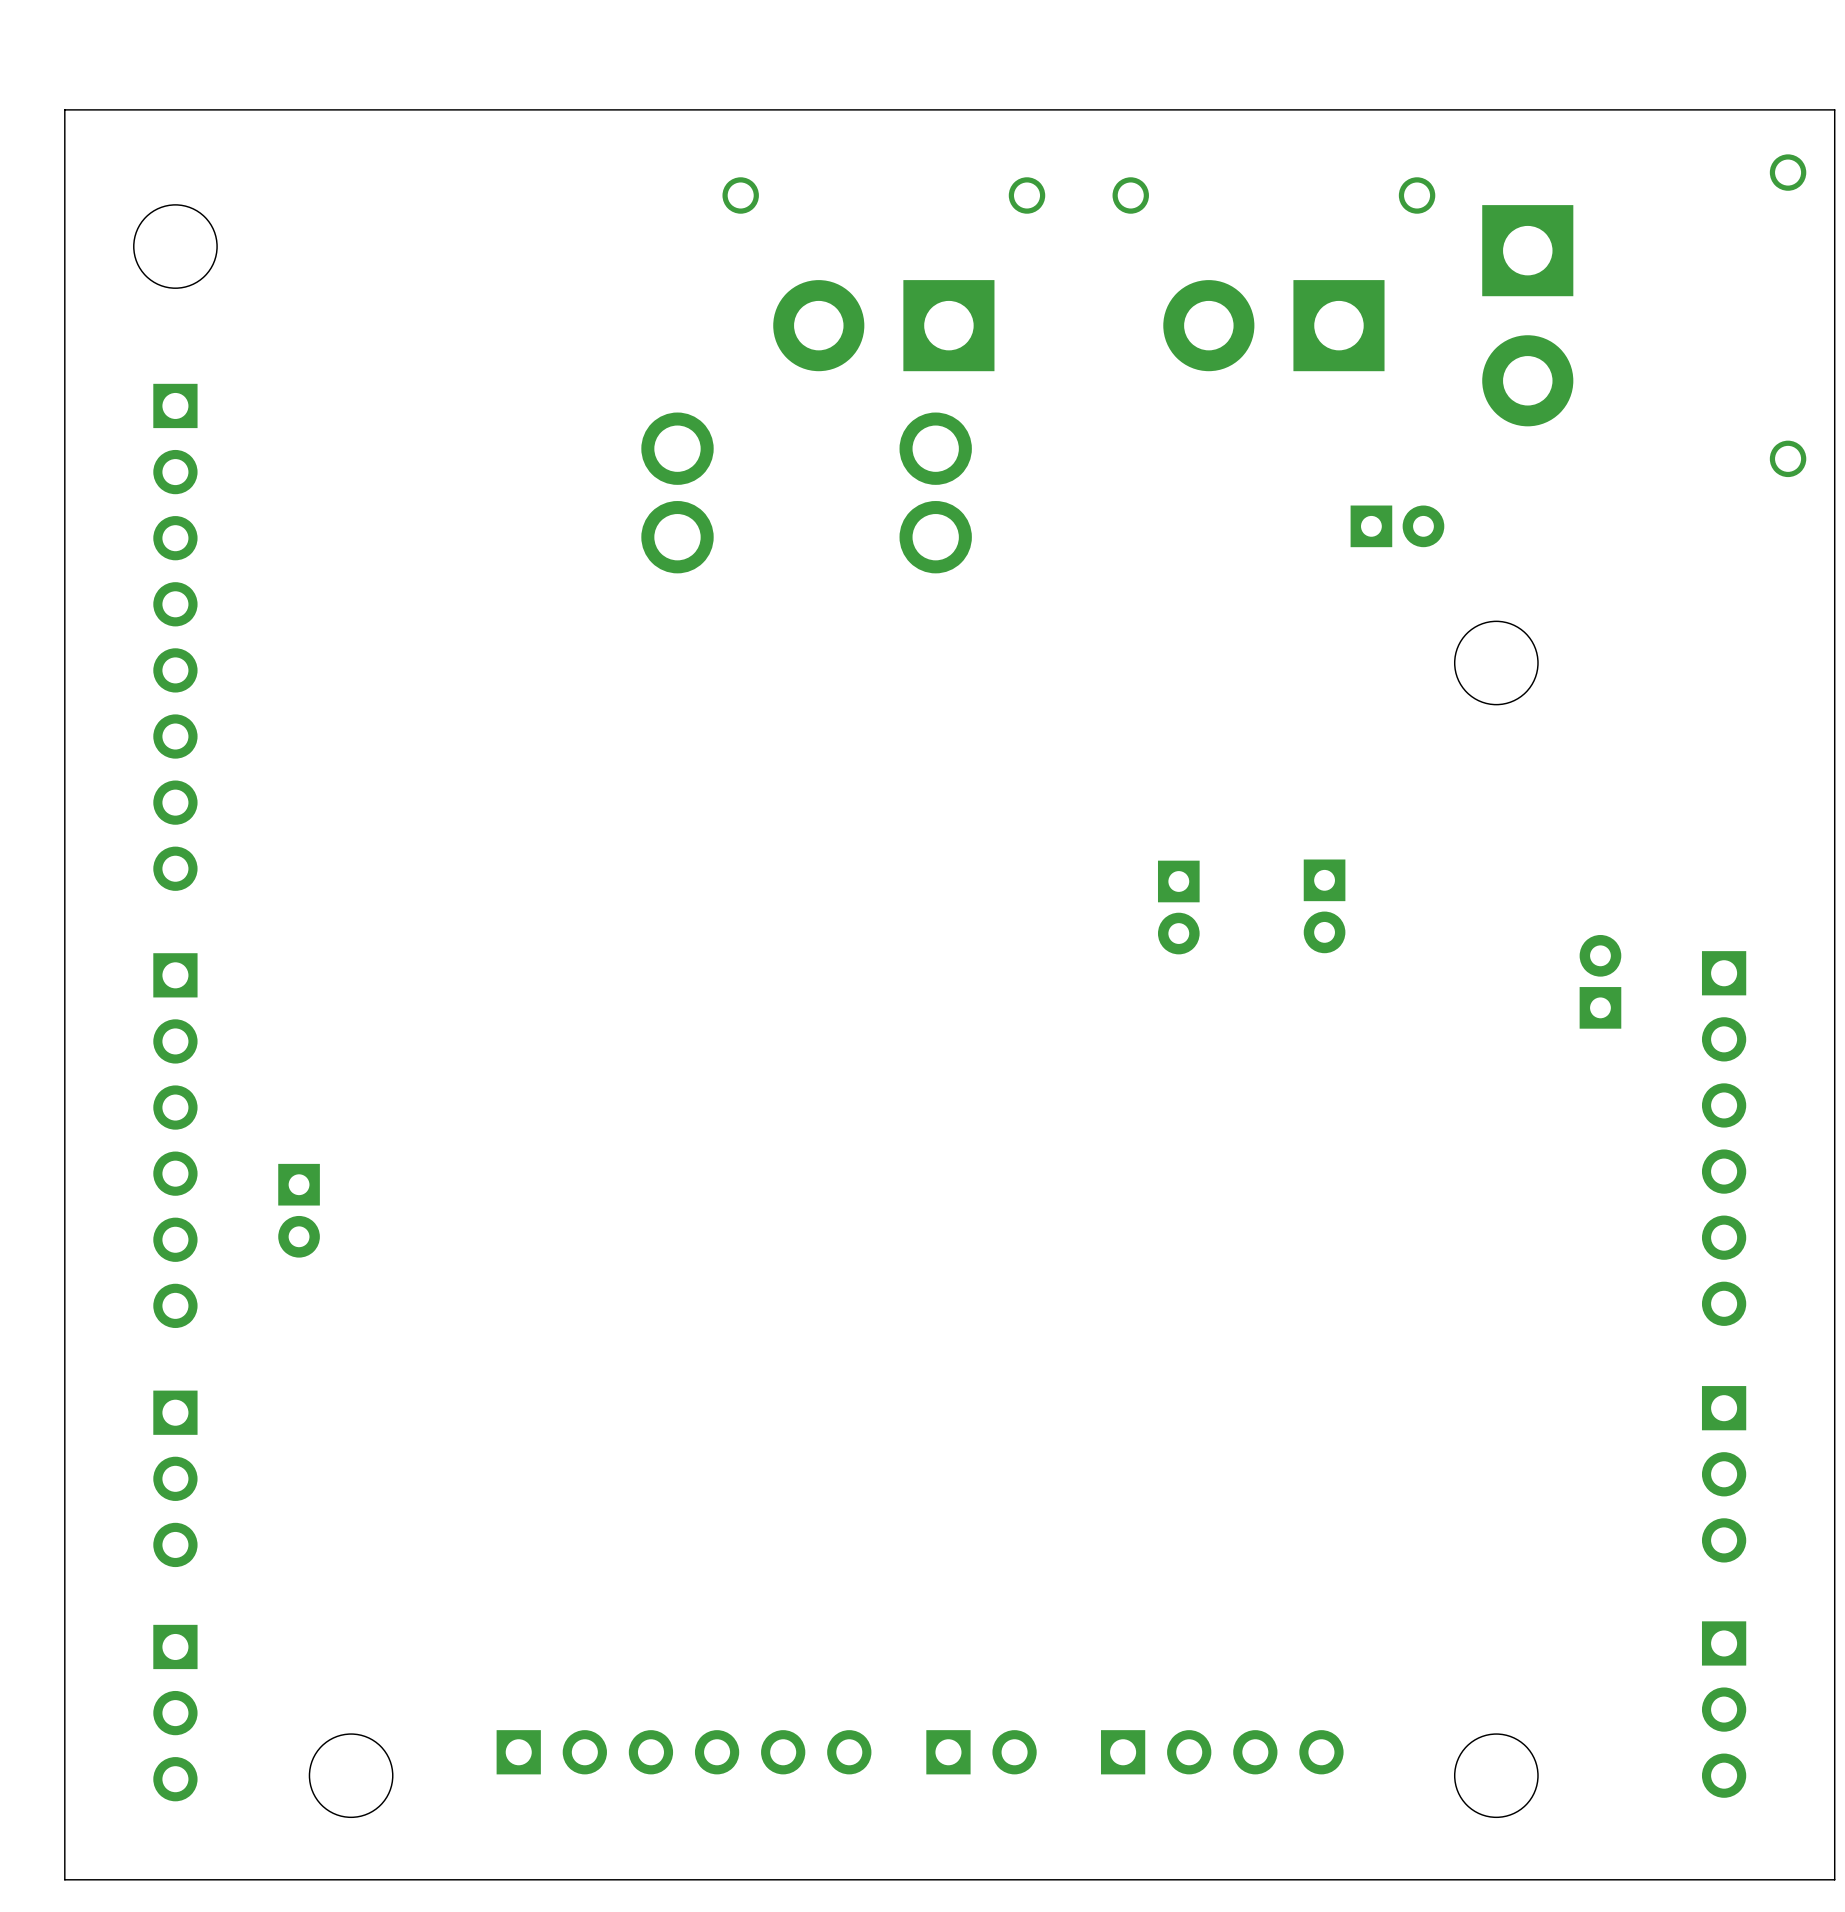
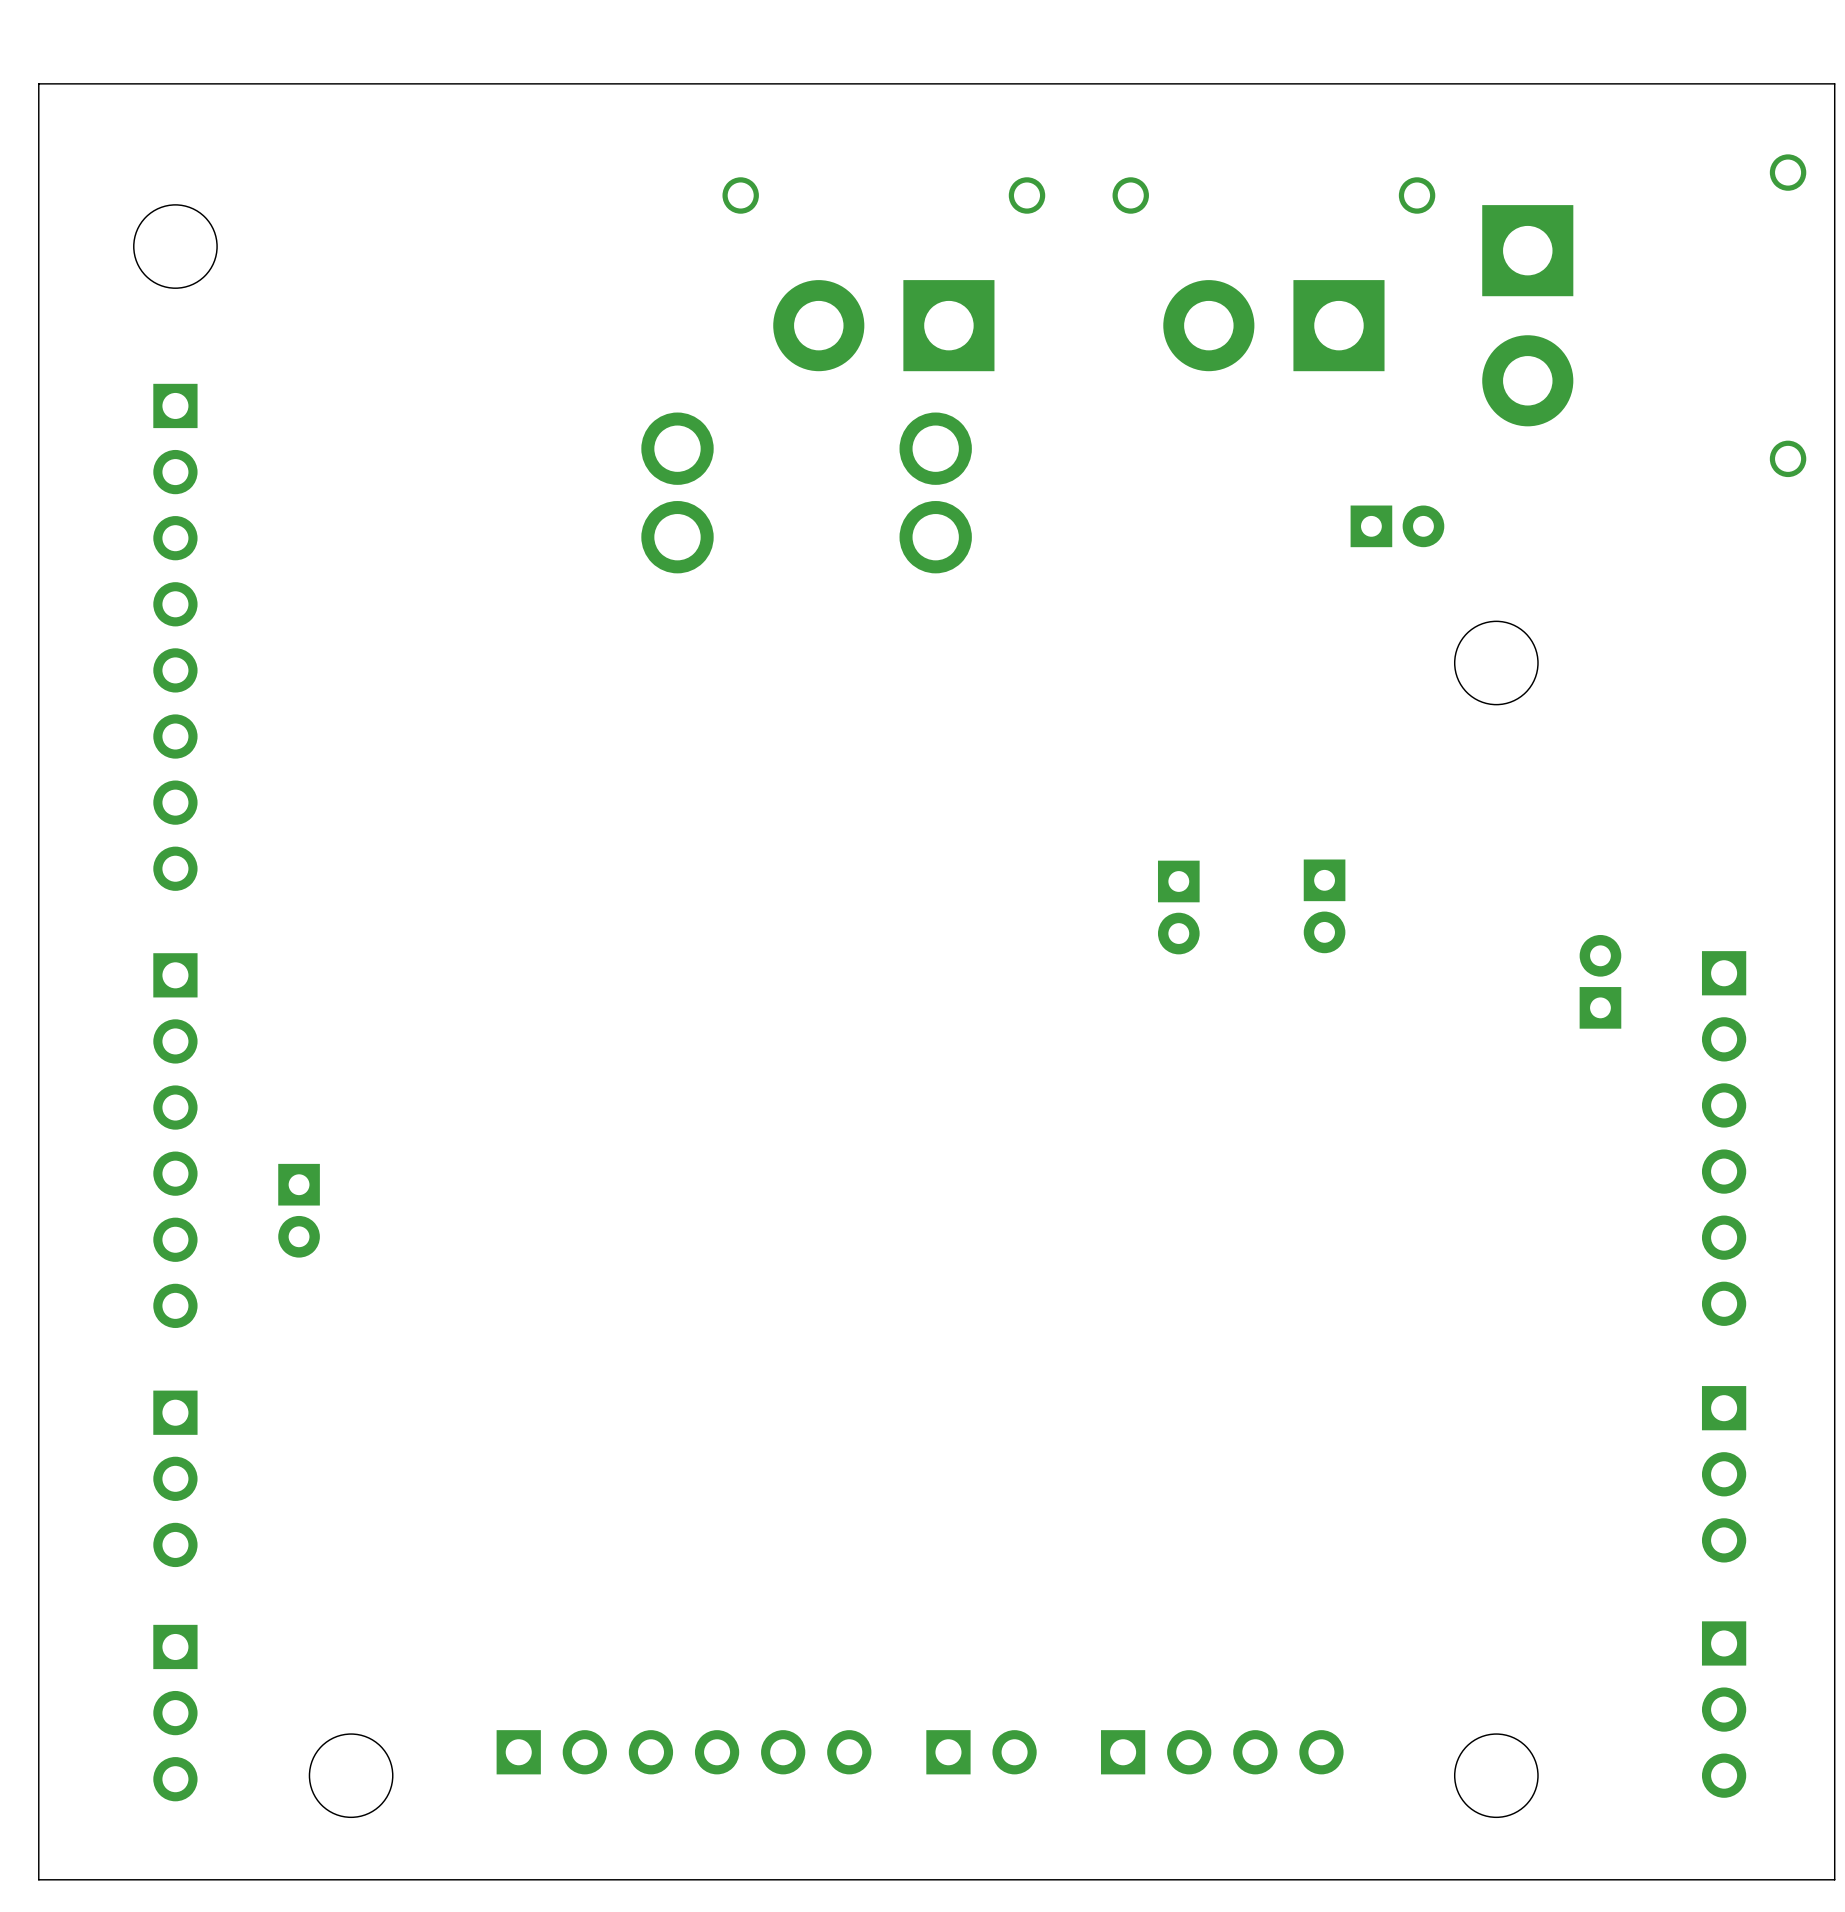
board edge: (1834, 109) (64, 109) (64, 1879) -> (1834, 109) (1834, 83) (38, 83) (38, 1879) (64, 1879)

